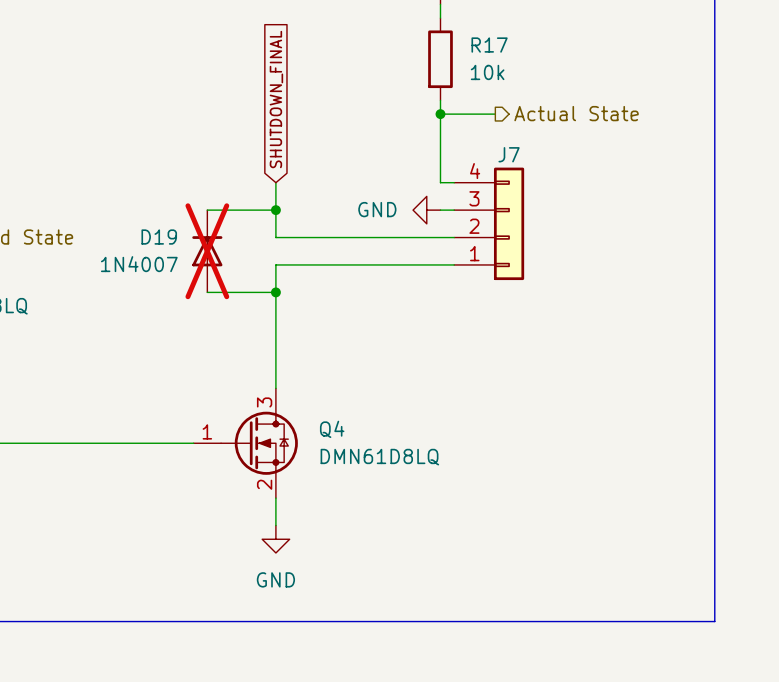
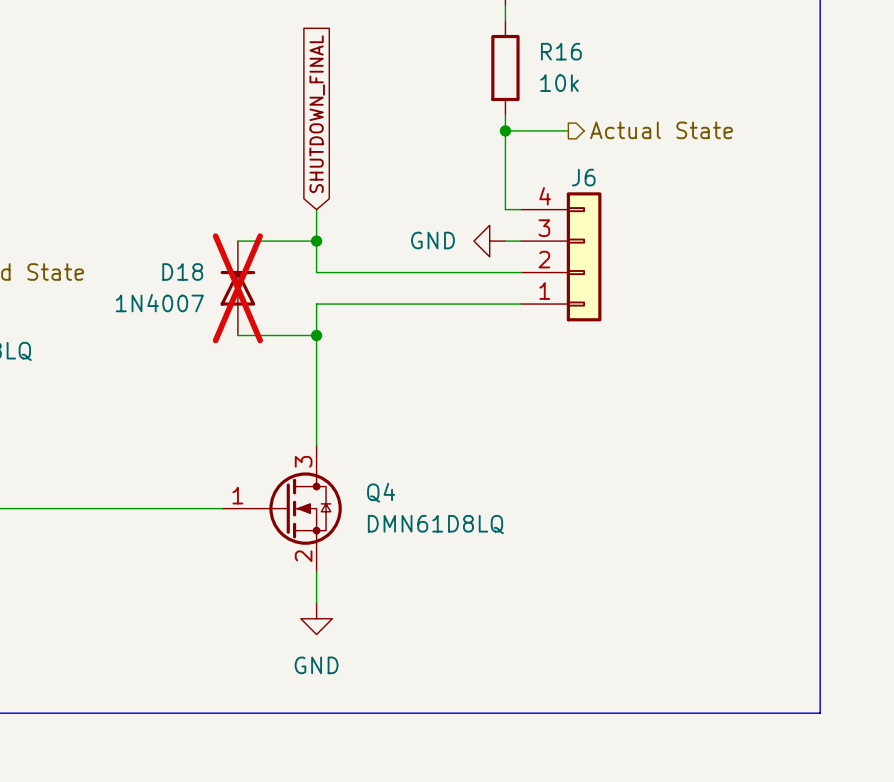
R17 name: R17 (489, 45) -> R16 (561, 51)
J7 name: J7 (509, 154) -> J6 (583, 177)
D19 name: D19 (159, 237) -> D18 (182, 271)

